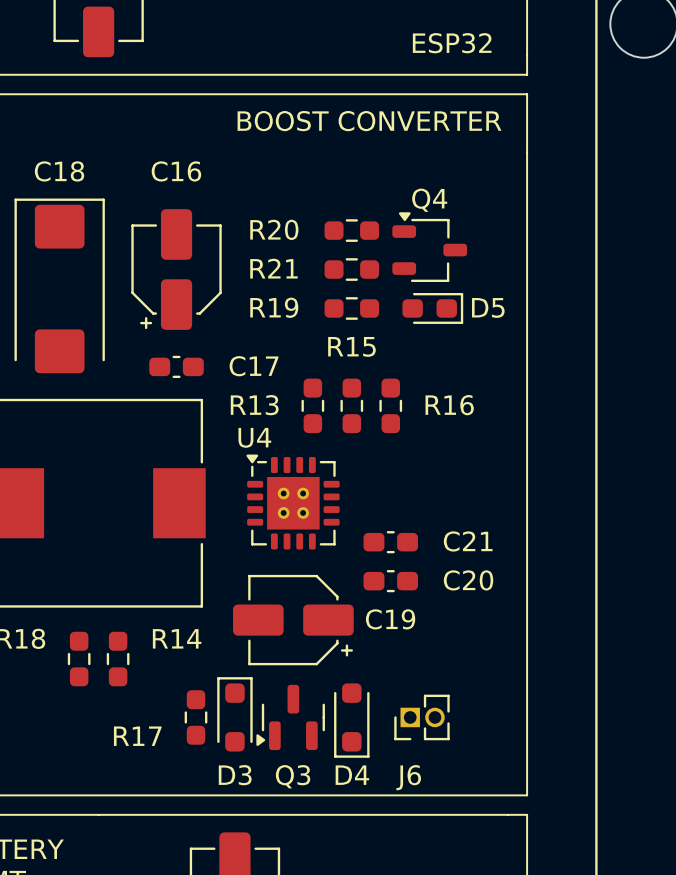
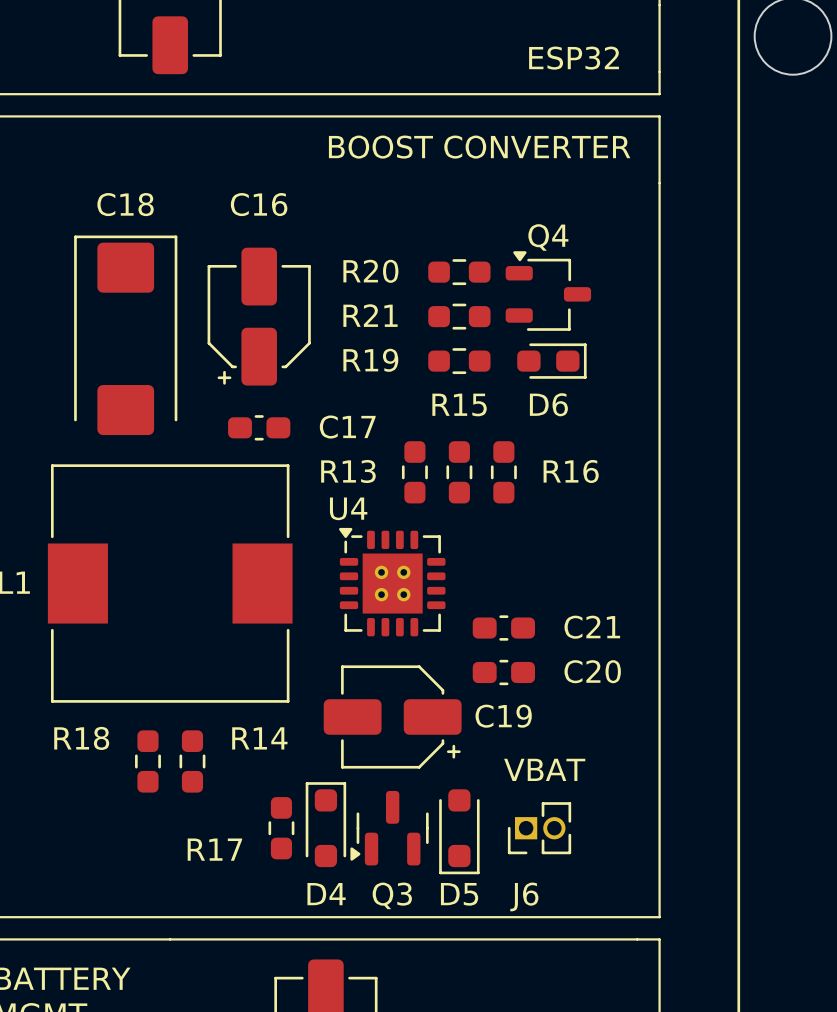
D5 name: D5 (488, 307) -> D6 (548, 404)
text: none -> VBAT (544, 769)
D3 name: D3 (235, 775) -> D4 (326, 894)
D4 name: D4 (352, 775) -> D5 (459, 894)

